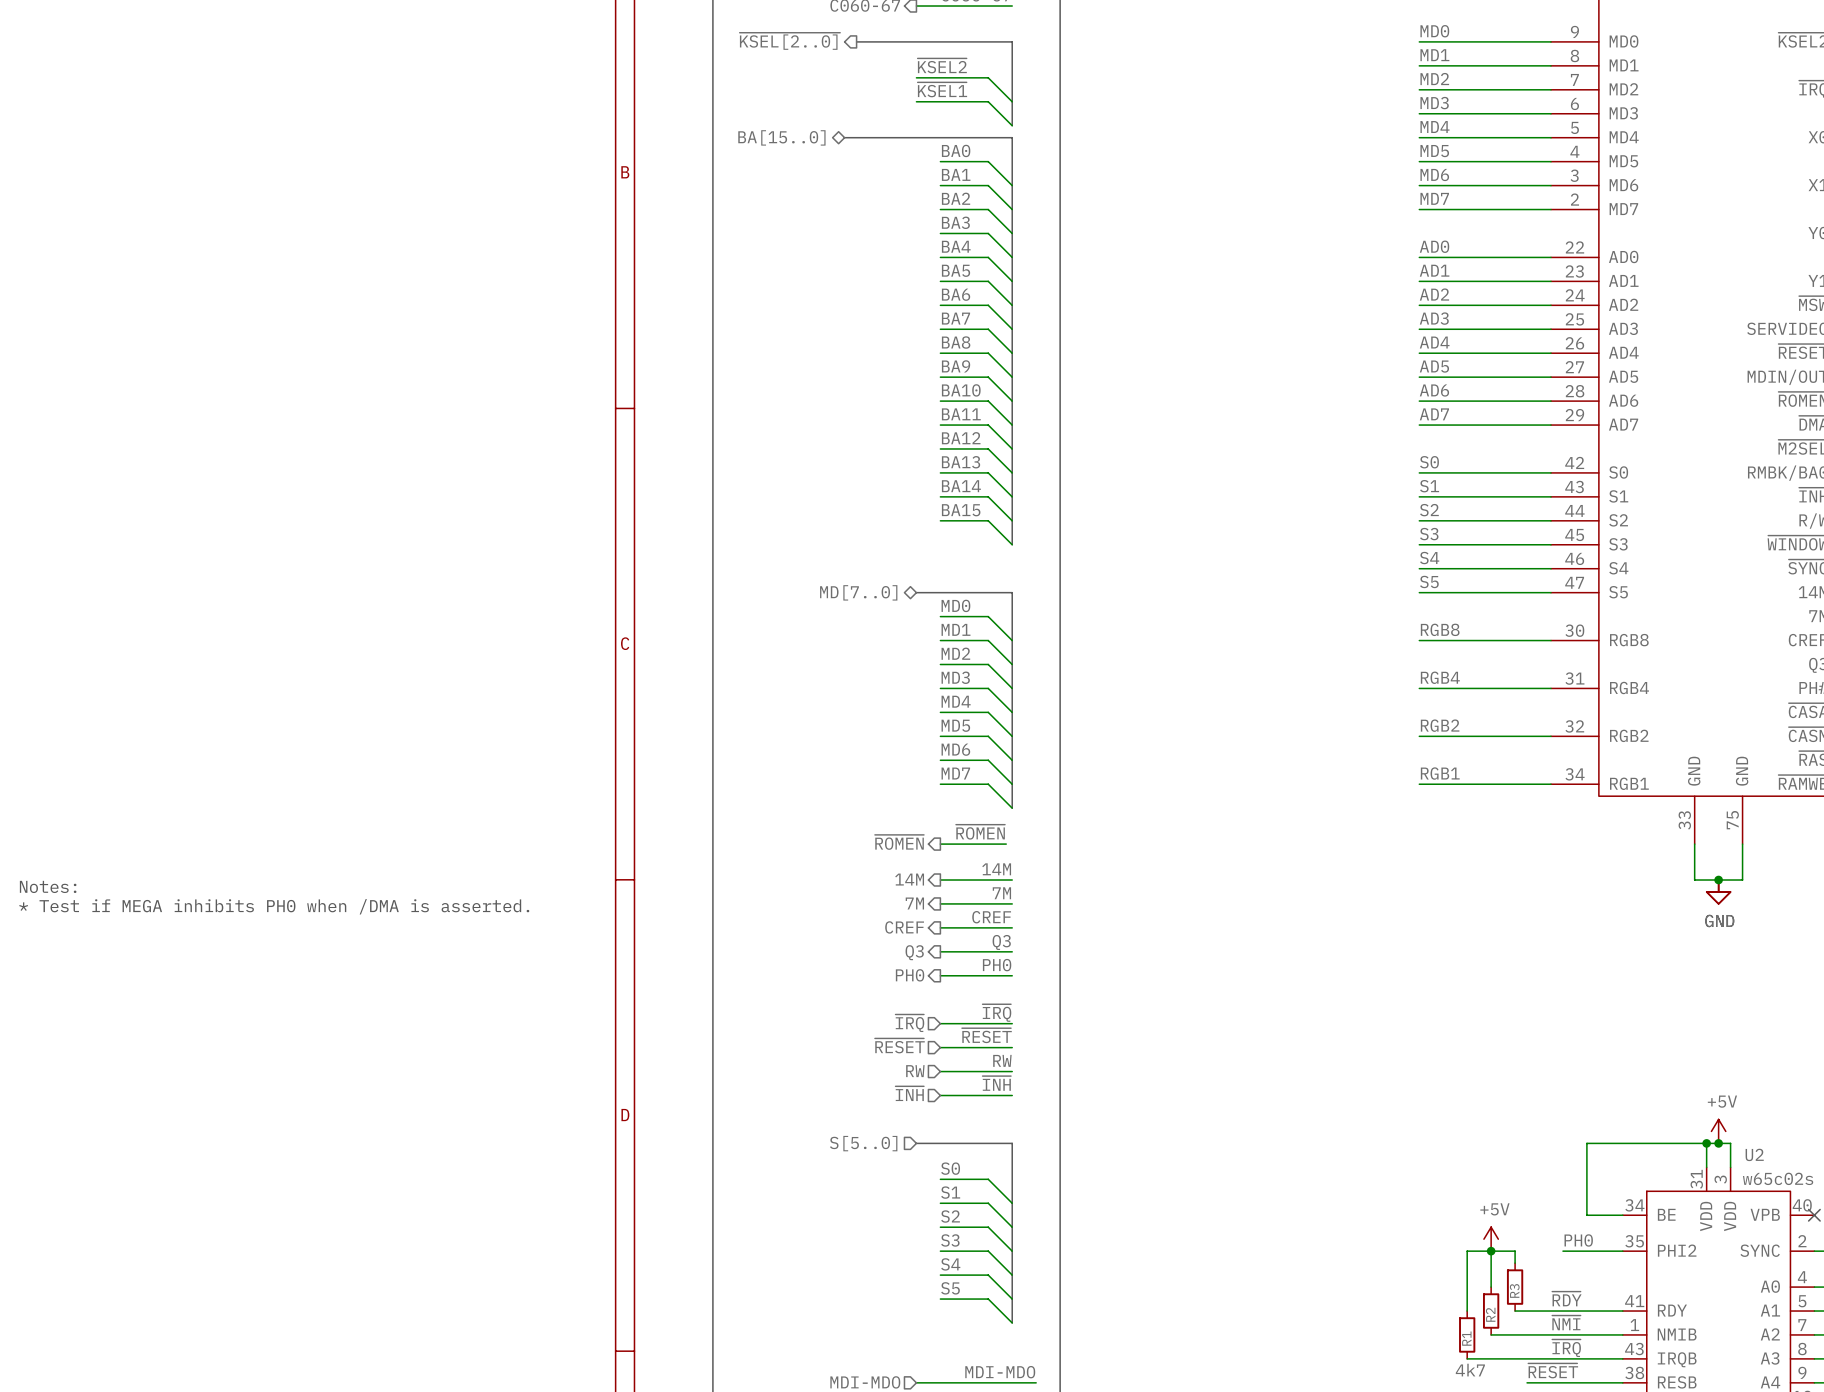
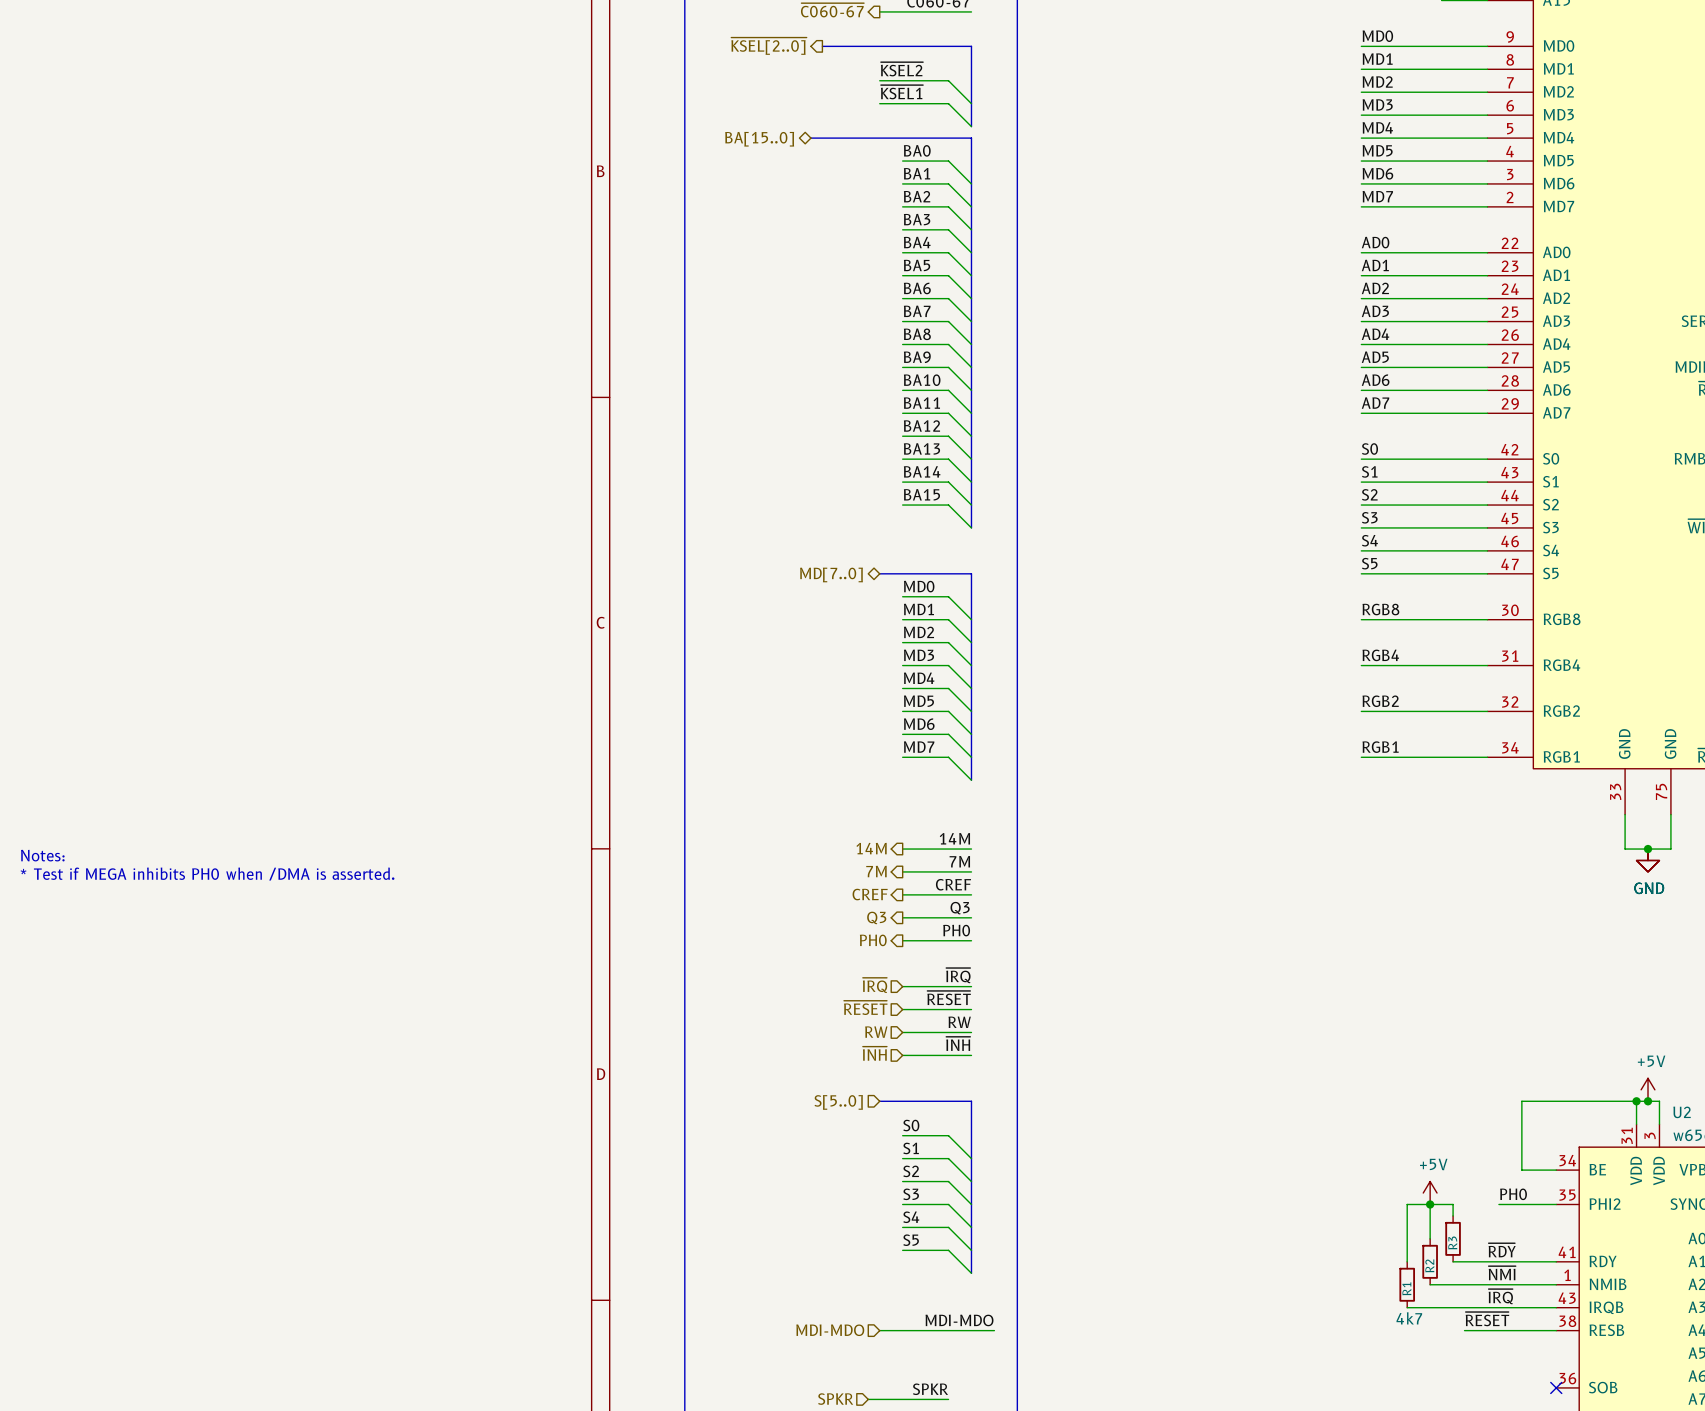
label: ~{ROMEN} (980, 832) -> none
hierarchical label: ~{ROMEN} (899, 842) -> none
wire: (940, 844) (1006, 844) -> none

